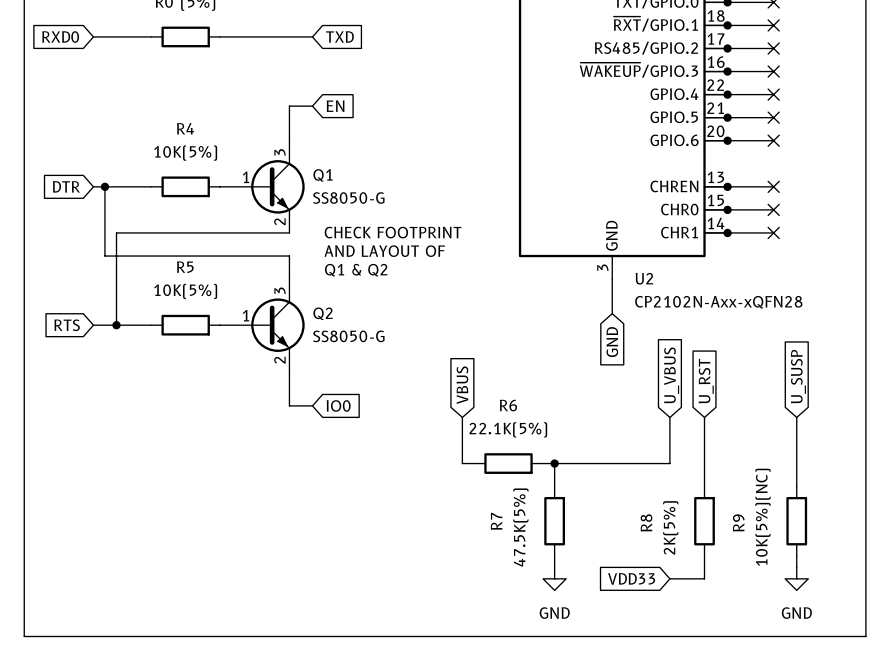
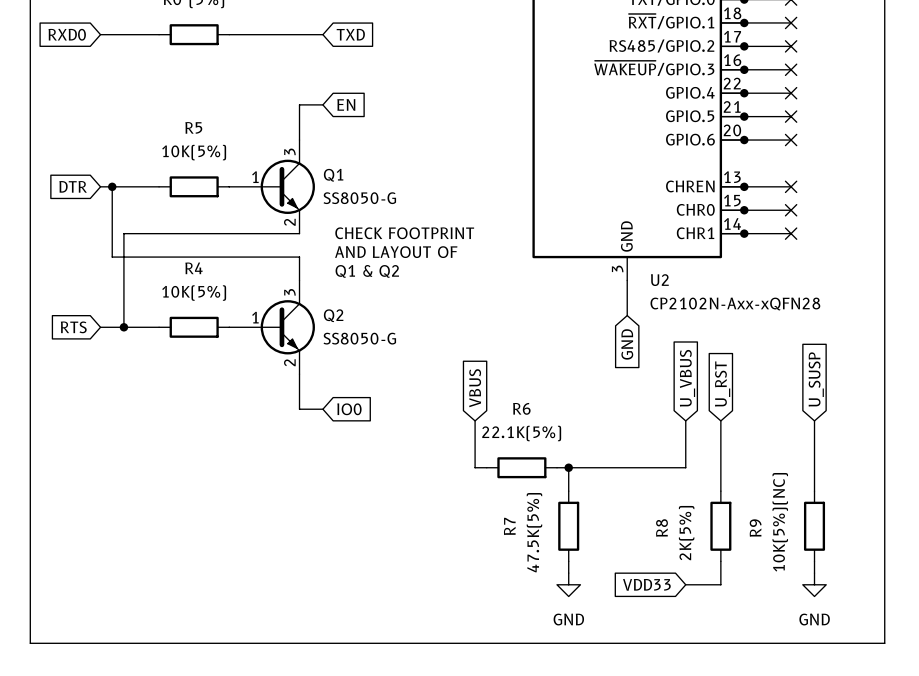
R4 name: R4 (185, 128) -> R5 (193, 127)
R5 name: R5 (185, 267) -> R4 (193, 268)

